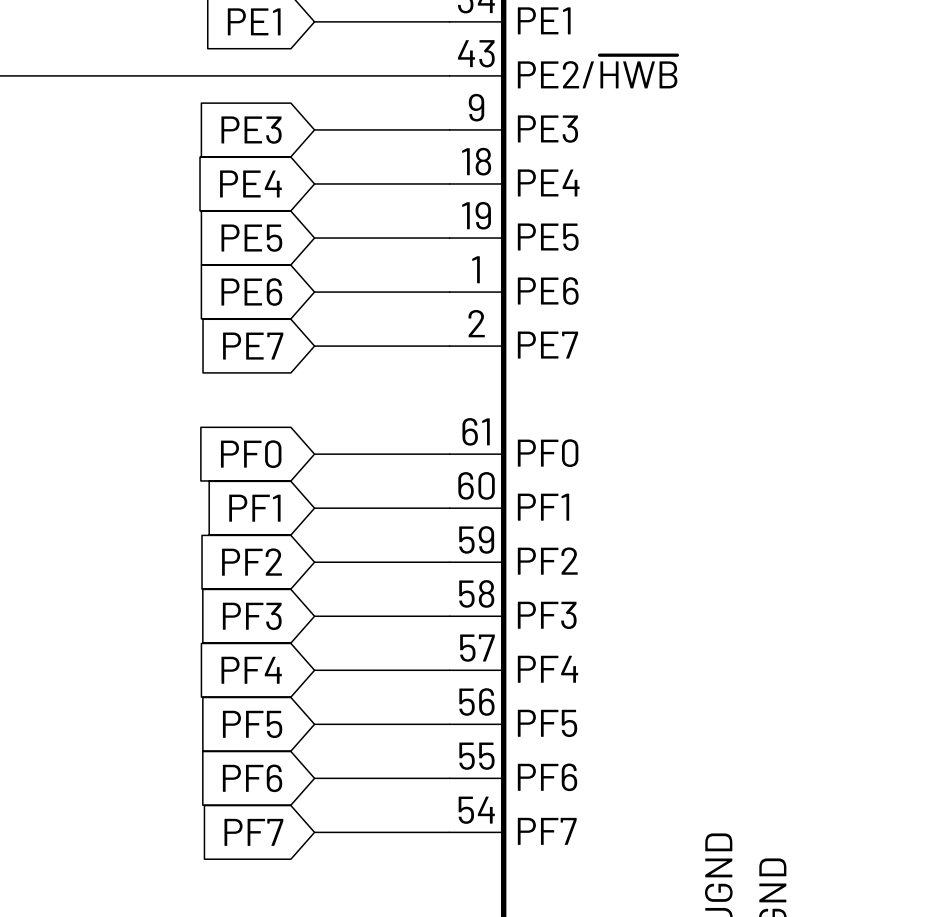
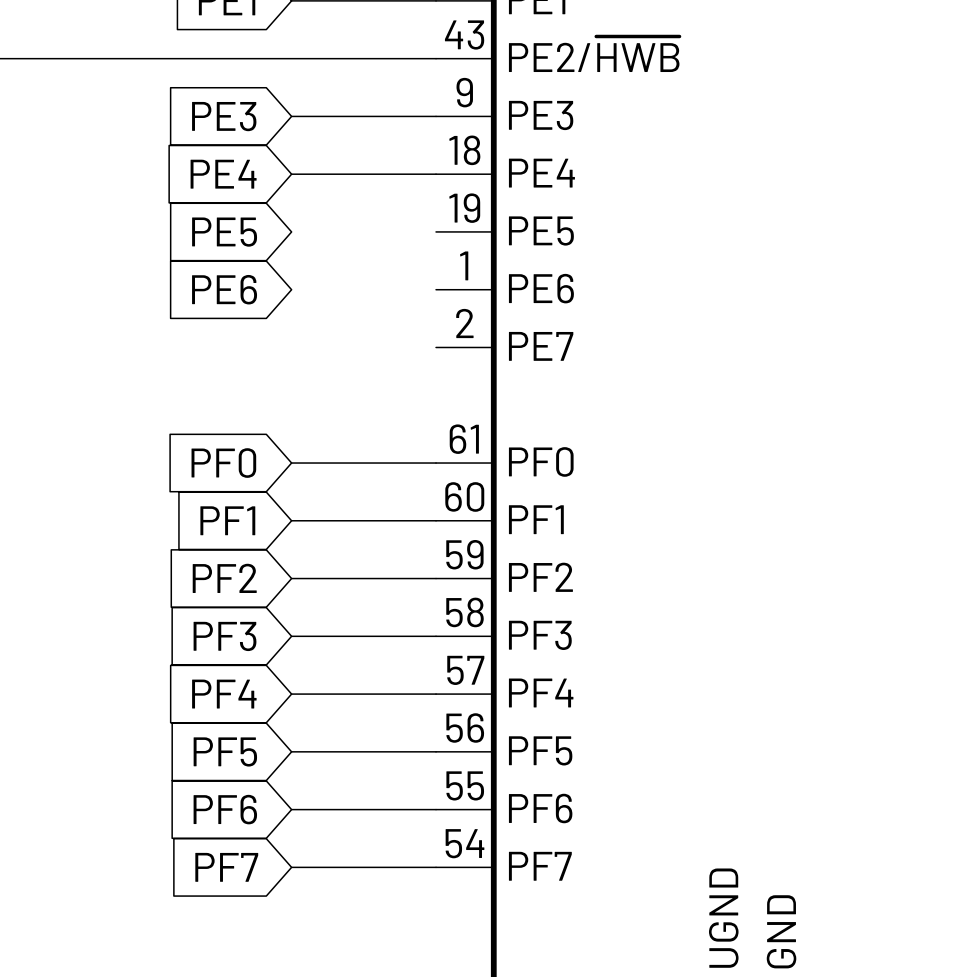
wire: (314, 238) (449, 238) -> none
wire: (314, 292) (449, 292) -> none
global label: PE7 (253, 346) -> none
wire: (314, 346) (449, 346) -> none

